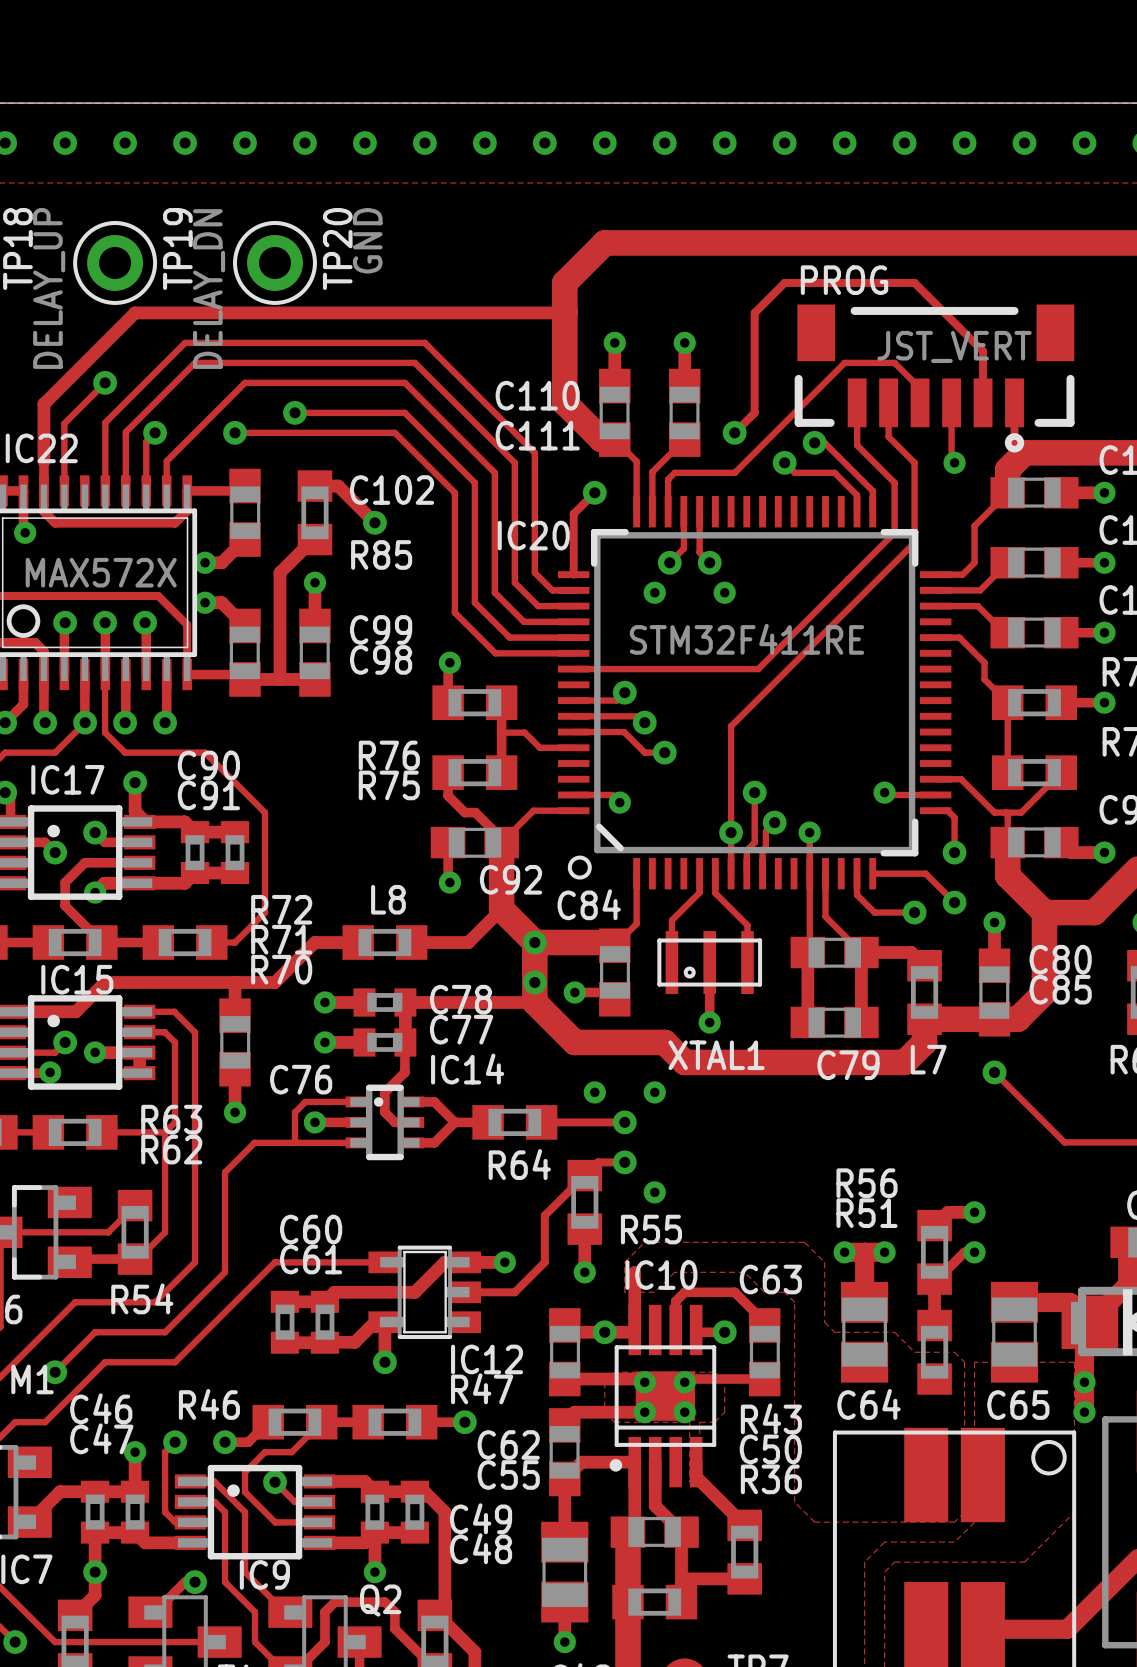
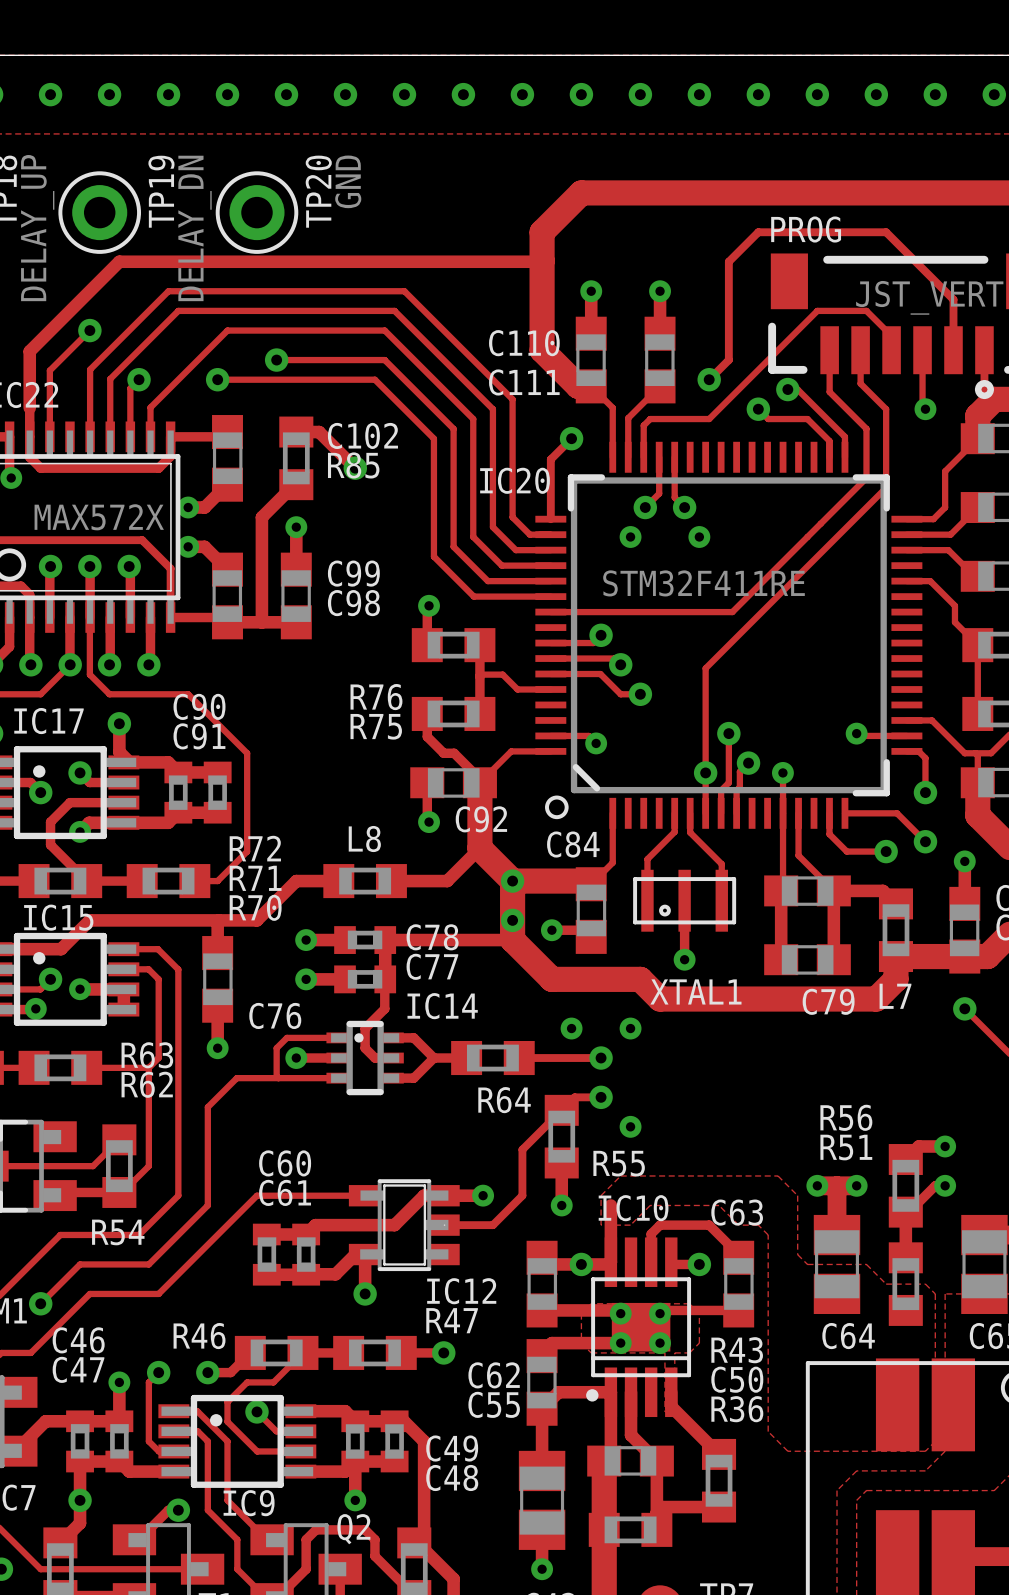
R85 name position: R85 (381, 554) -> R85 (353, 465)

